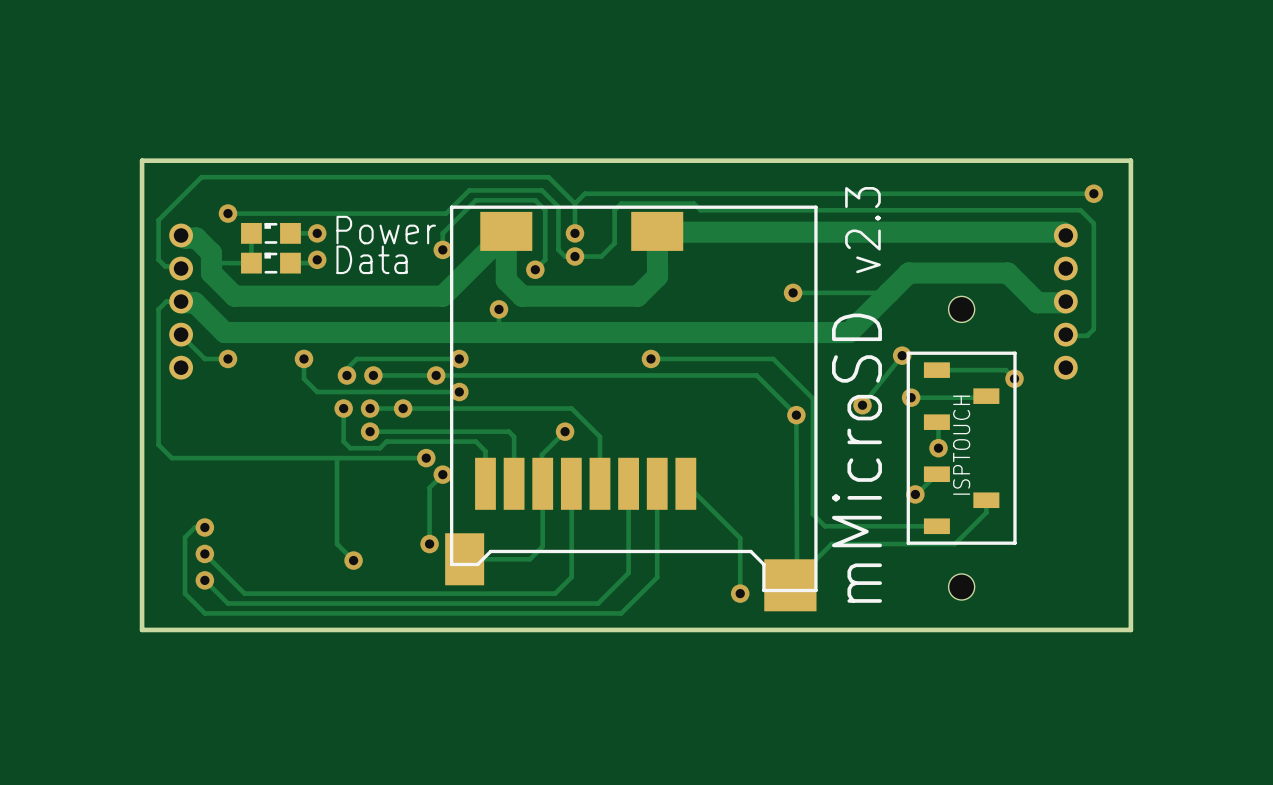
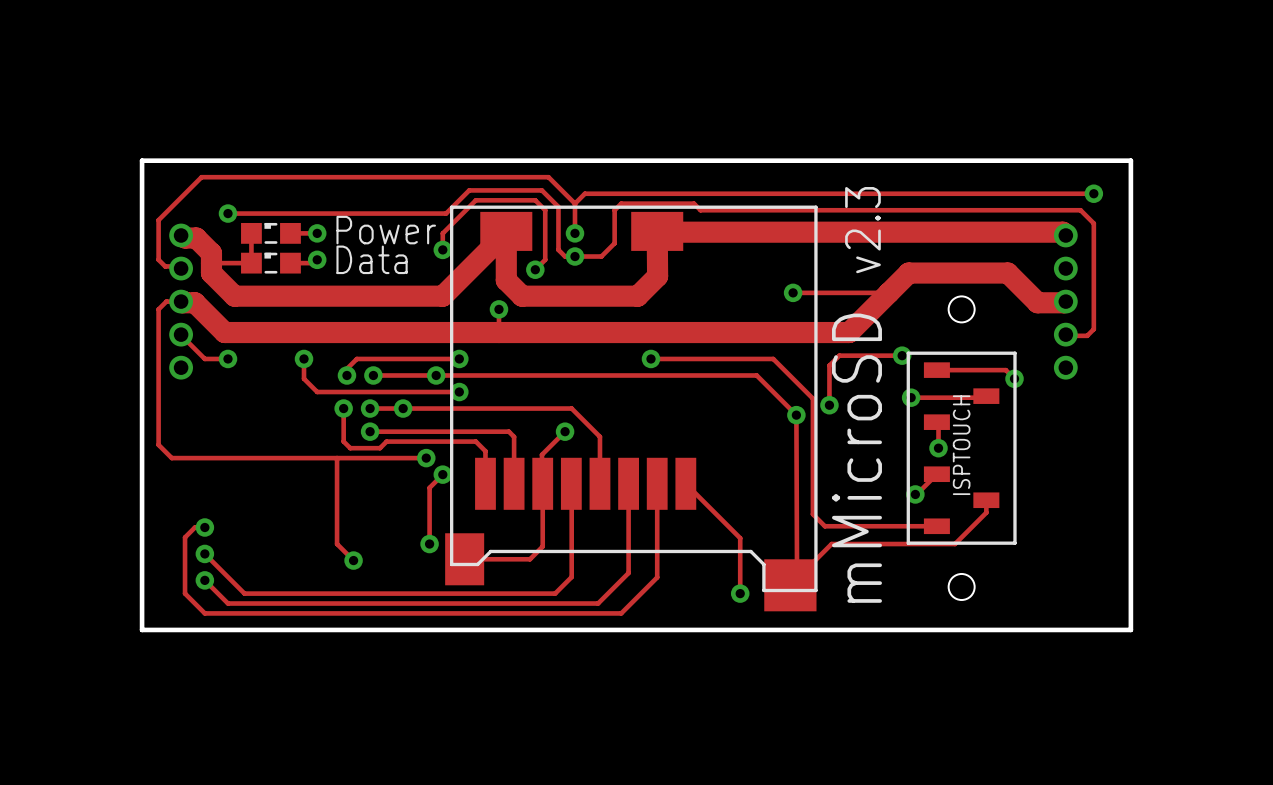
track: (902, 355) (862, 405) -> (902, 355) (839, 355) (829, 365) (829, 405)
via position: (862, 405) -> (829, 405)

